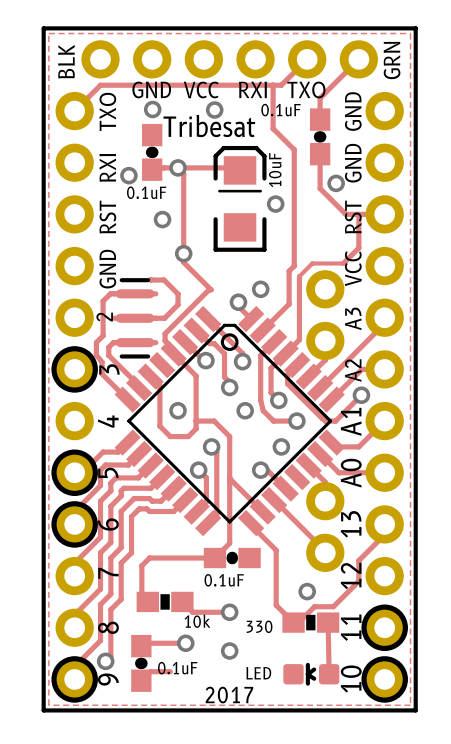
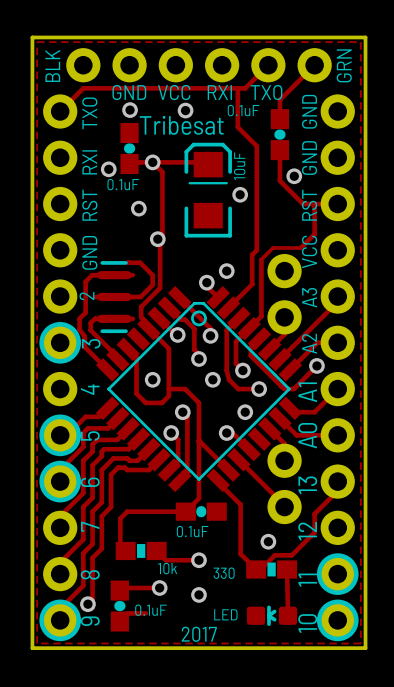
track: (183, 173) (183, 262) (211, 289) (165, 333) -> (157, 167) (162, 172) (160, 288) (141, 307) (141, 310)

